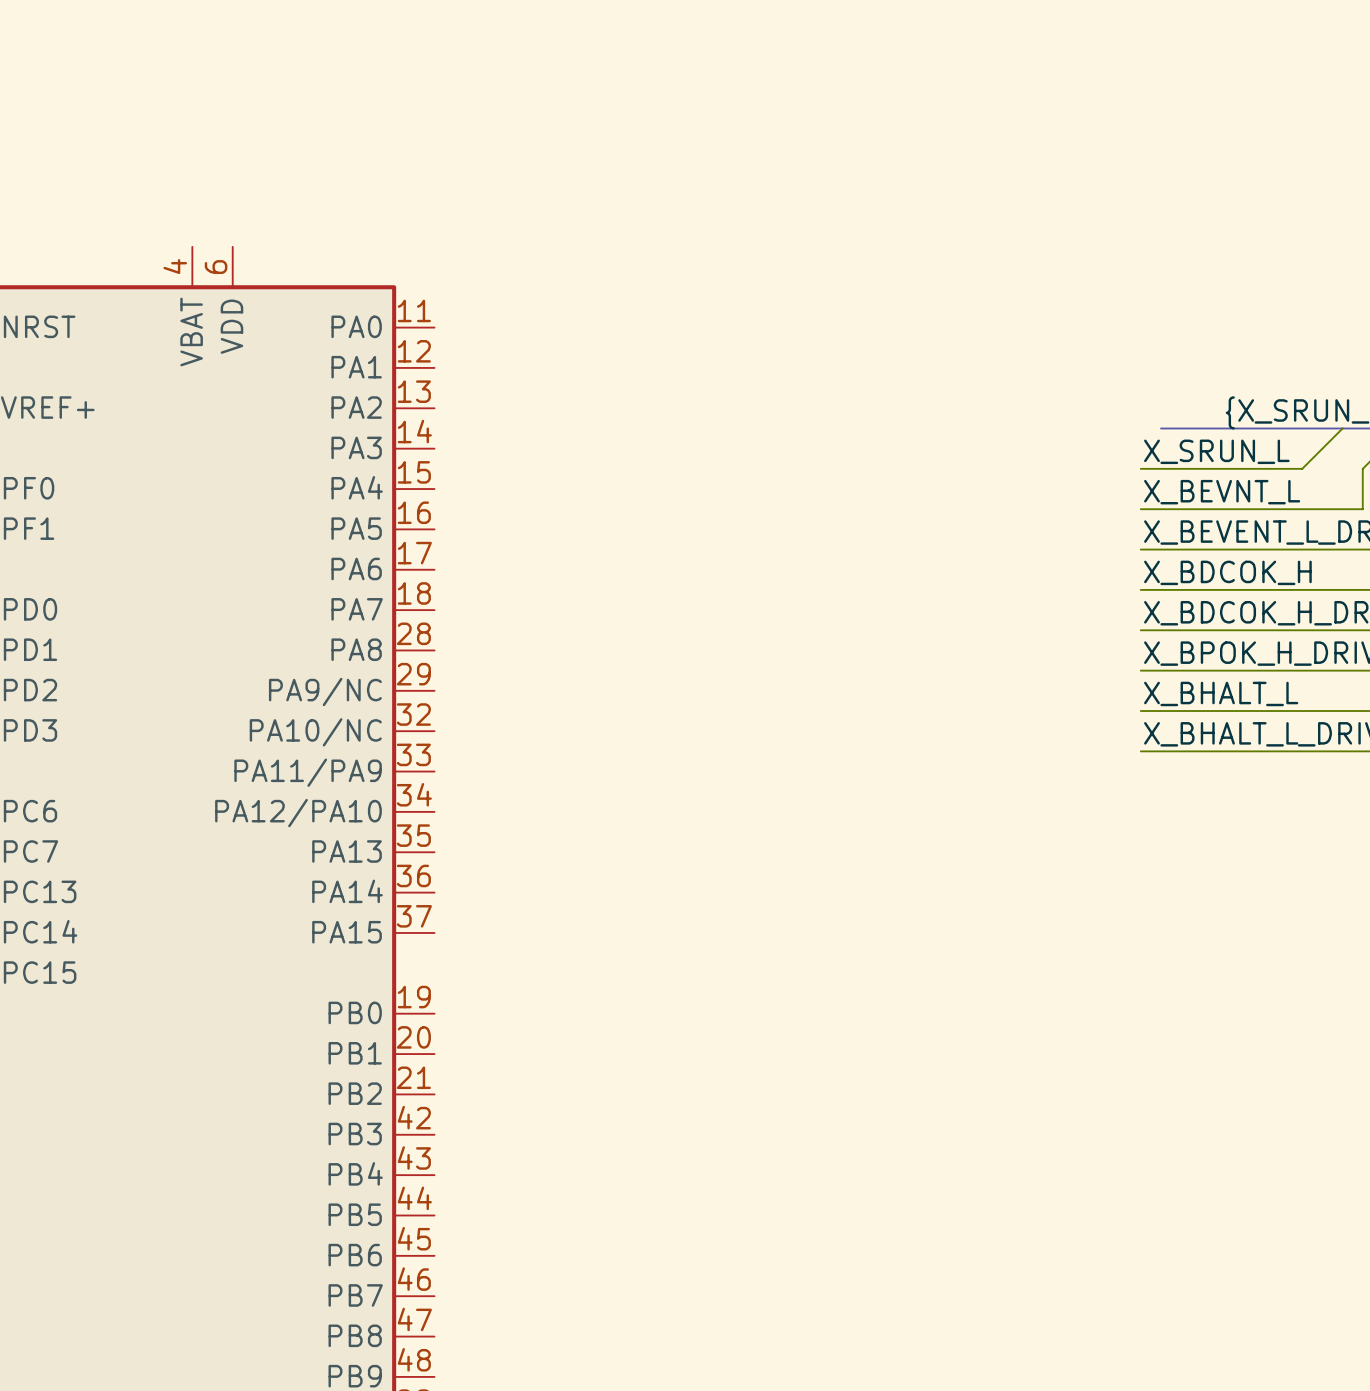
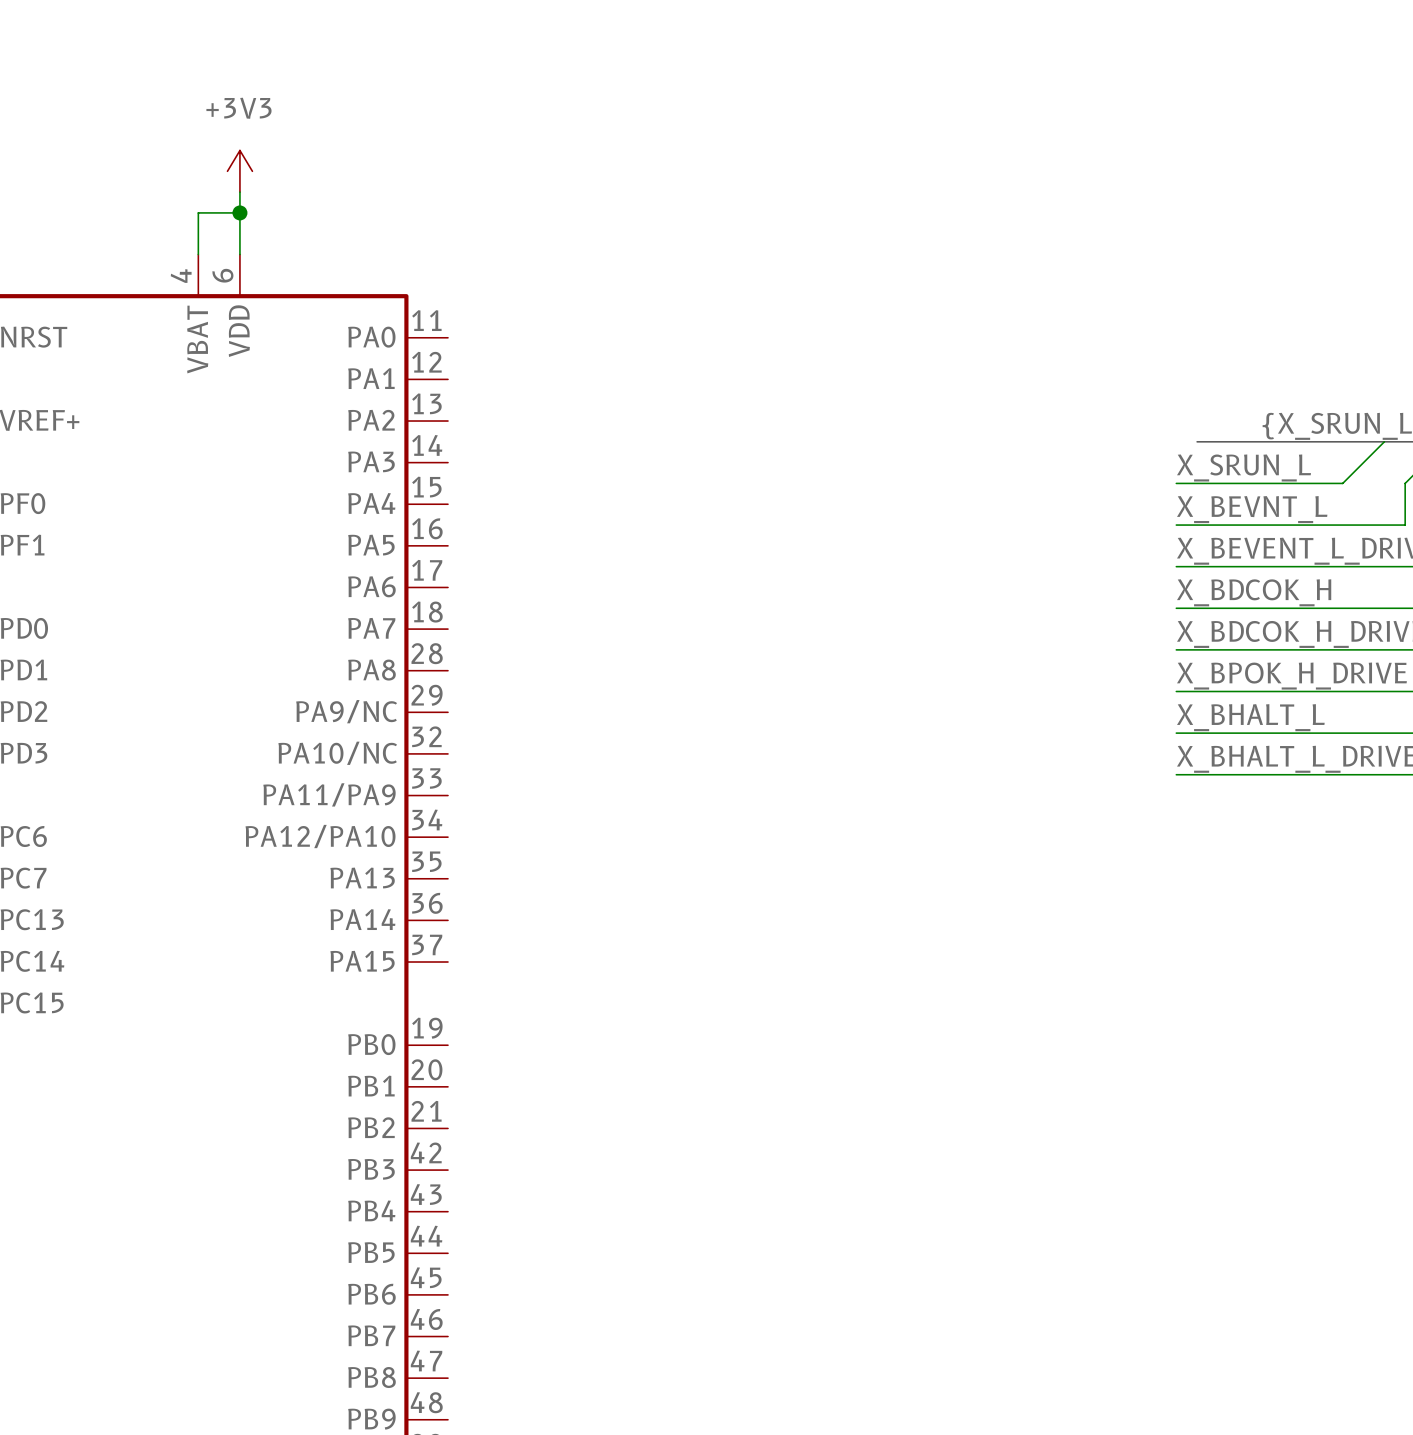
power symbol: none -> +3V3 (239, 171)
wire: none -> (239, 192) (239, 254)
wire: none -> (239, 212) (198, 212) (198, 254)
junction: none -> (239, 212)

